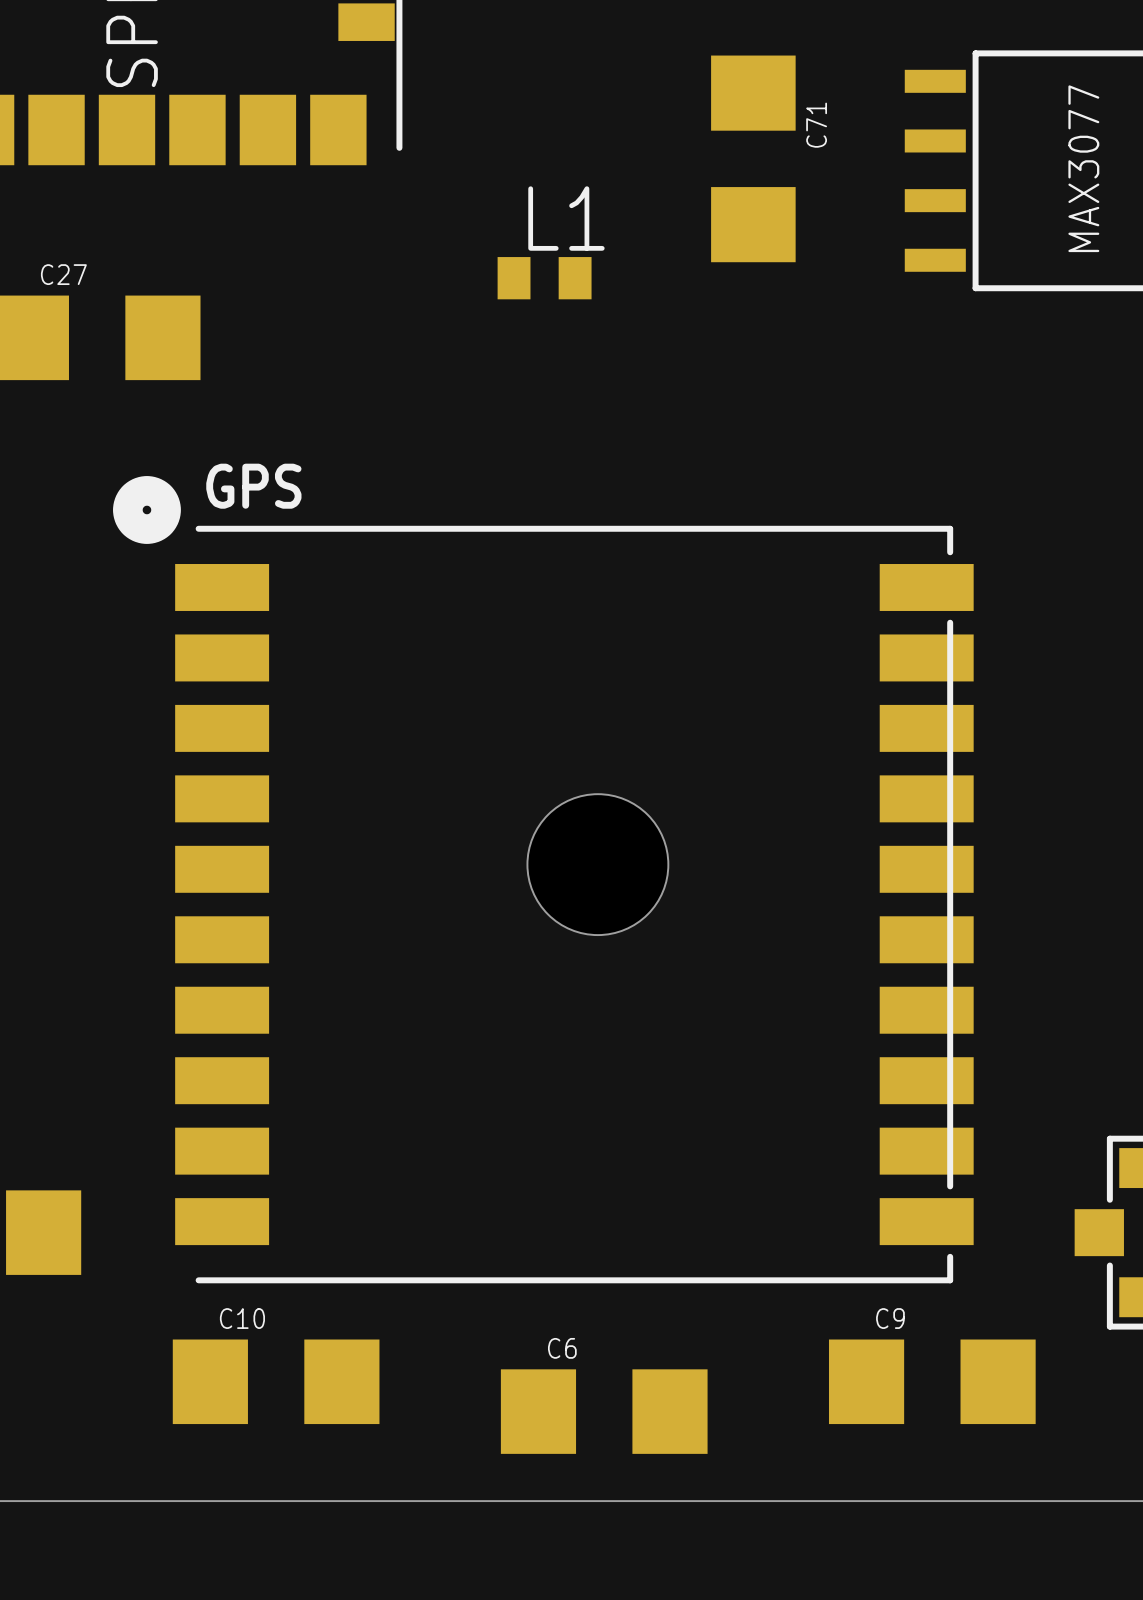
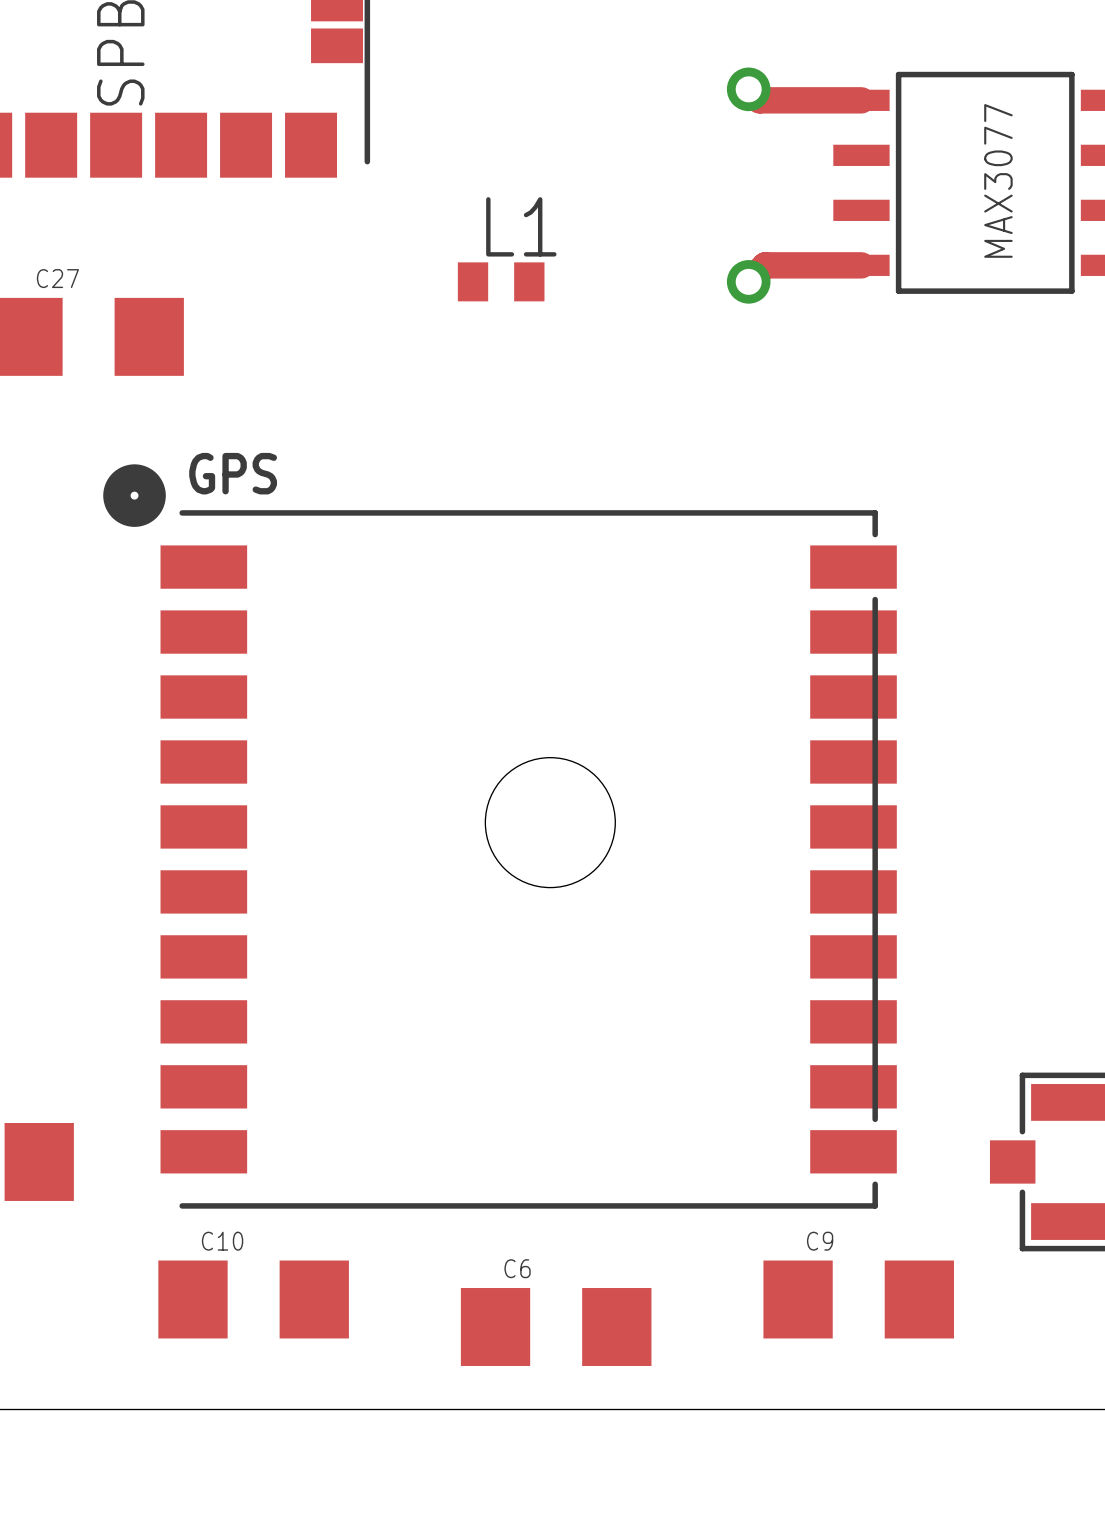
track: none -> (748, 89) (759, 100) (861, 100)
via: none -> (748, 89)
C71: (753, 158) -> none
track: none -> (861, 265) (765, 265) (748, 281)
via: none -> (748, 281)

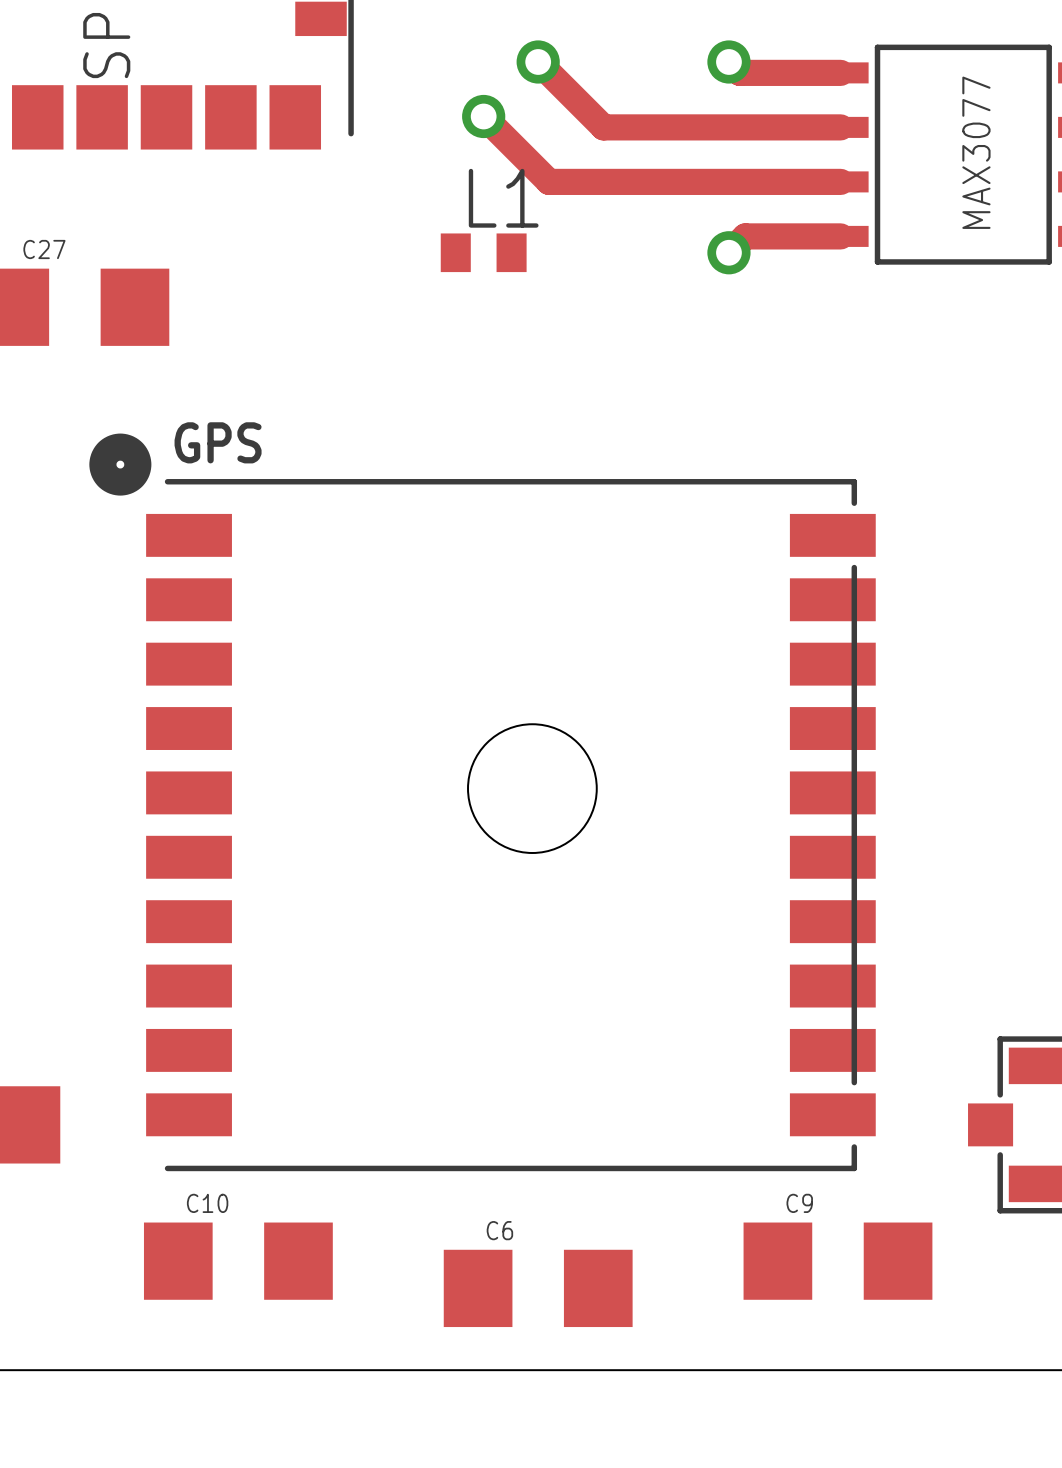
track: none -> (538, 61) (603, 127) (840, 127)
via: none -> (538, 61)
track: none -> (483, 116) (549, 181) (840, 181)
via: none -> (483, 116)

